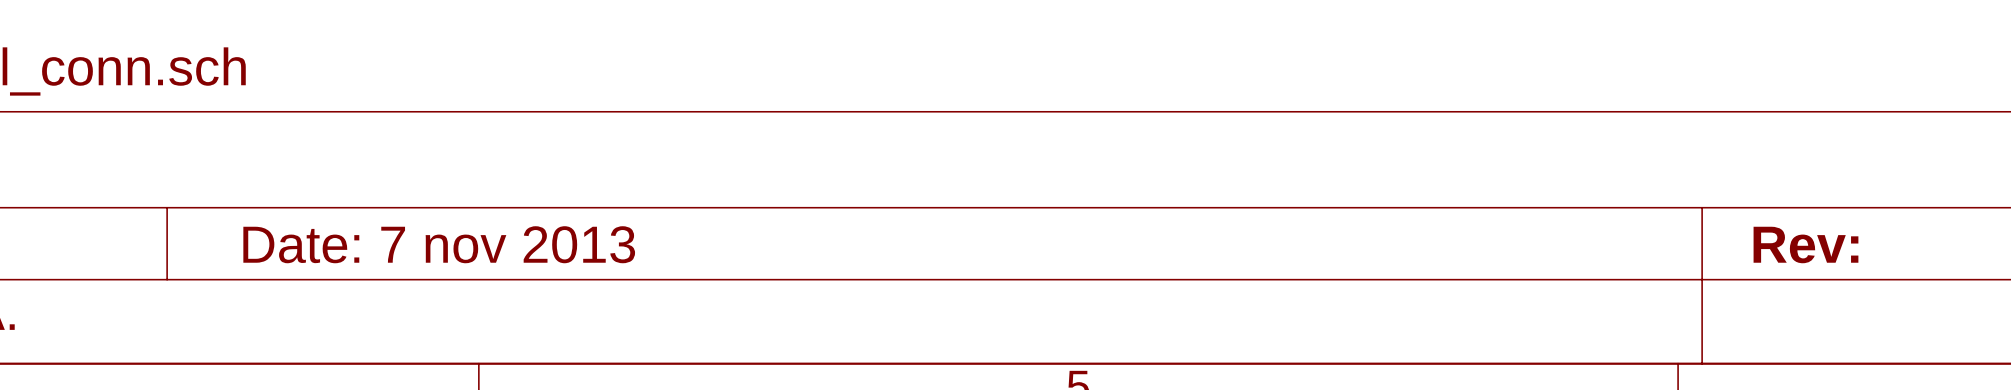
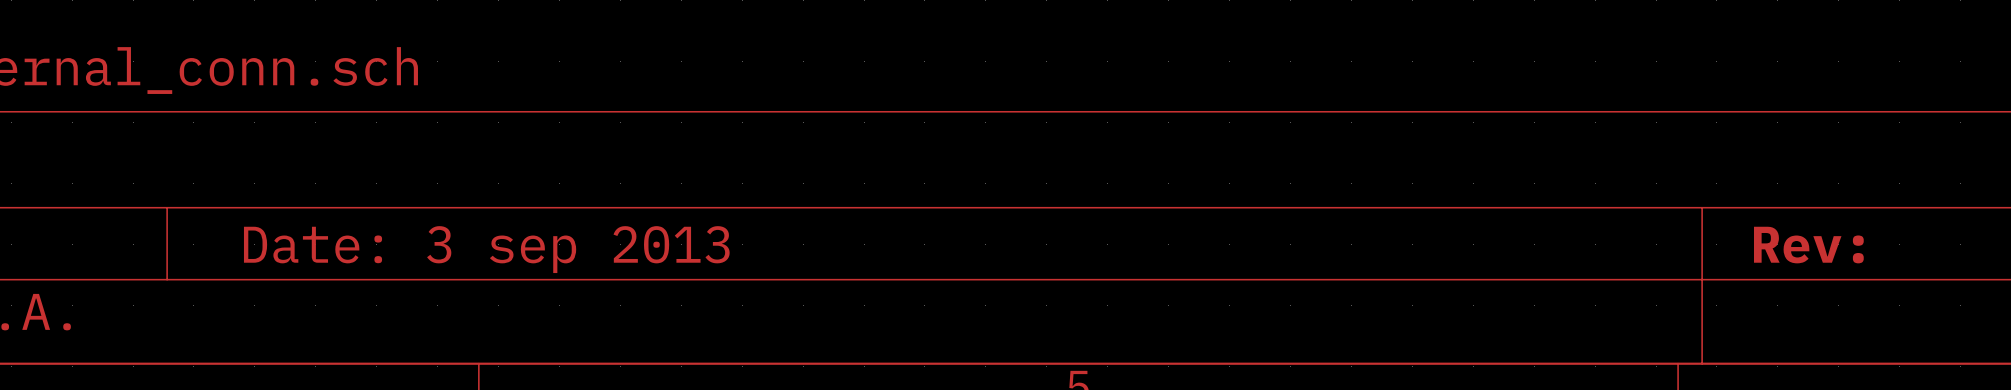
title block: Date: 7 nov 2013 (439, 244) -> Date: 3 sep 2013 (486, 249)

